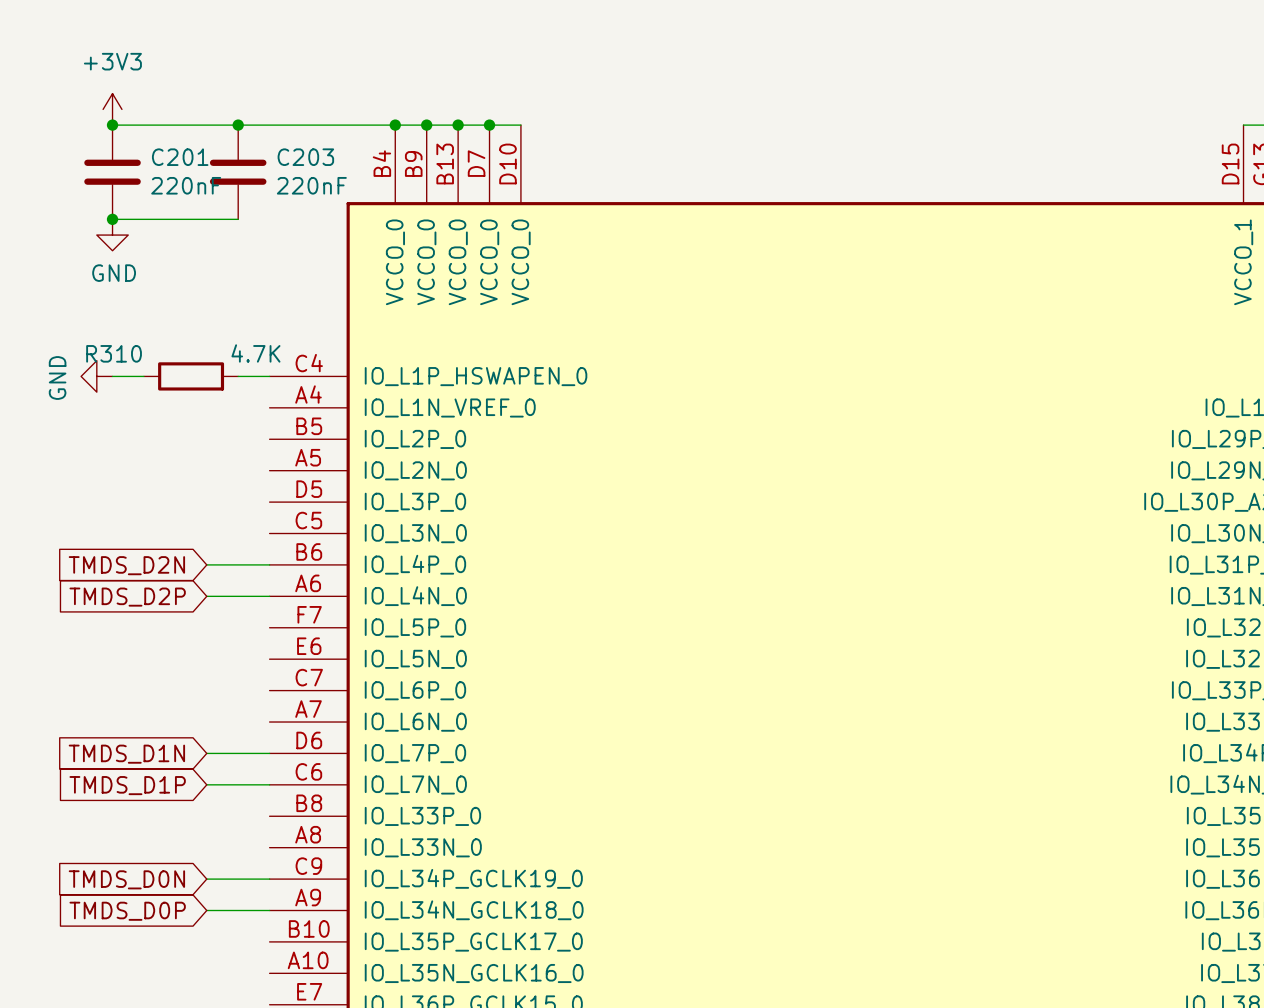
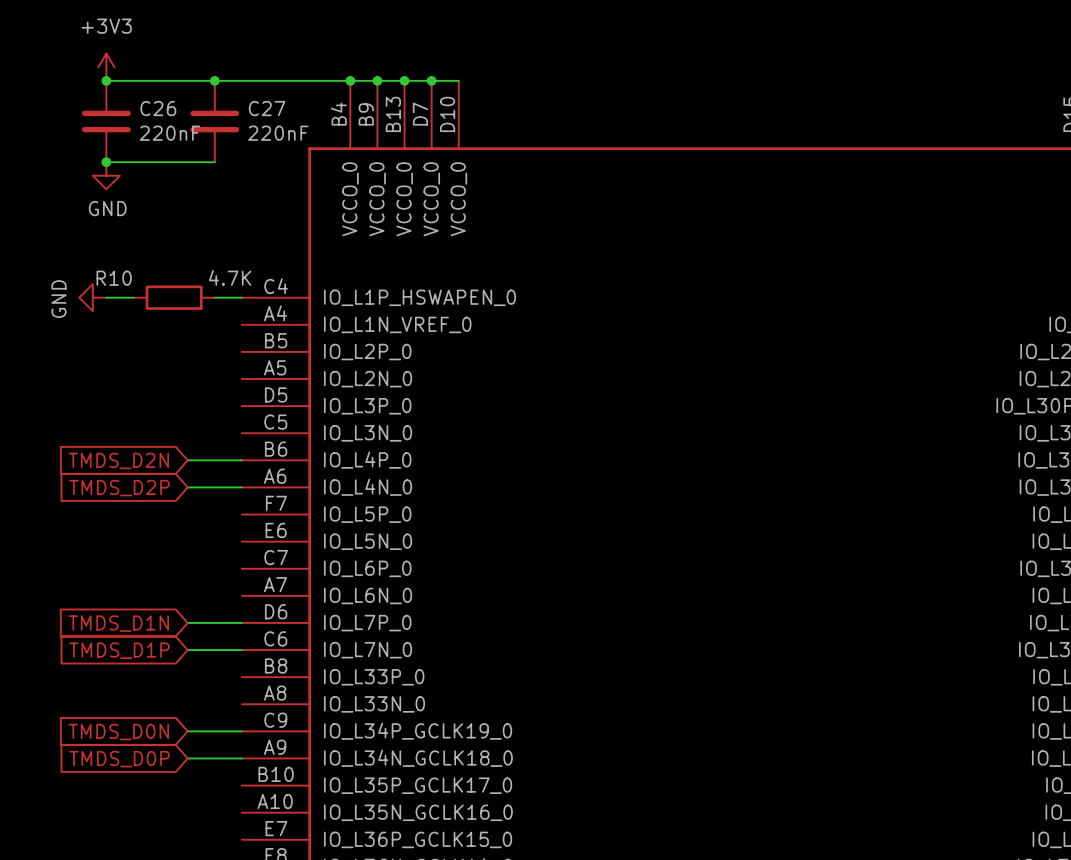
C201 name: C201 (180, 157) -> C26 (158, 108)
C203 name: C203 (305, 157) -> C27 (267, 108)
R310 name: R310 (114, 353) -> R10 (114, 278)

